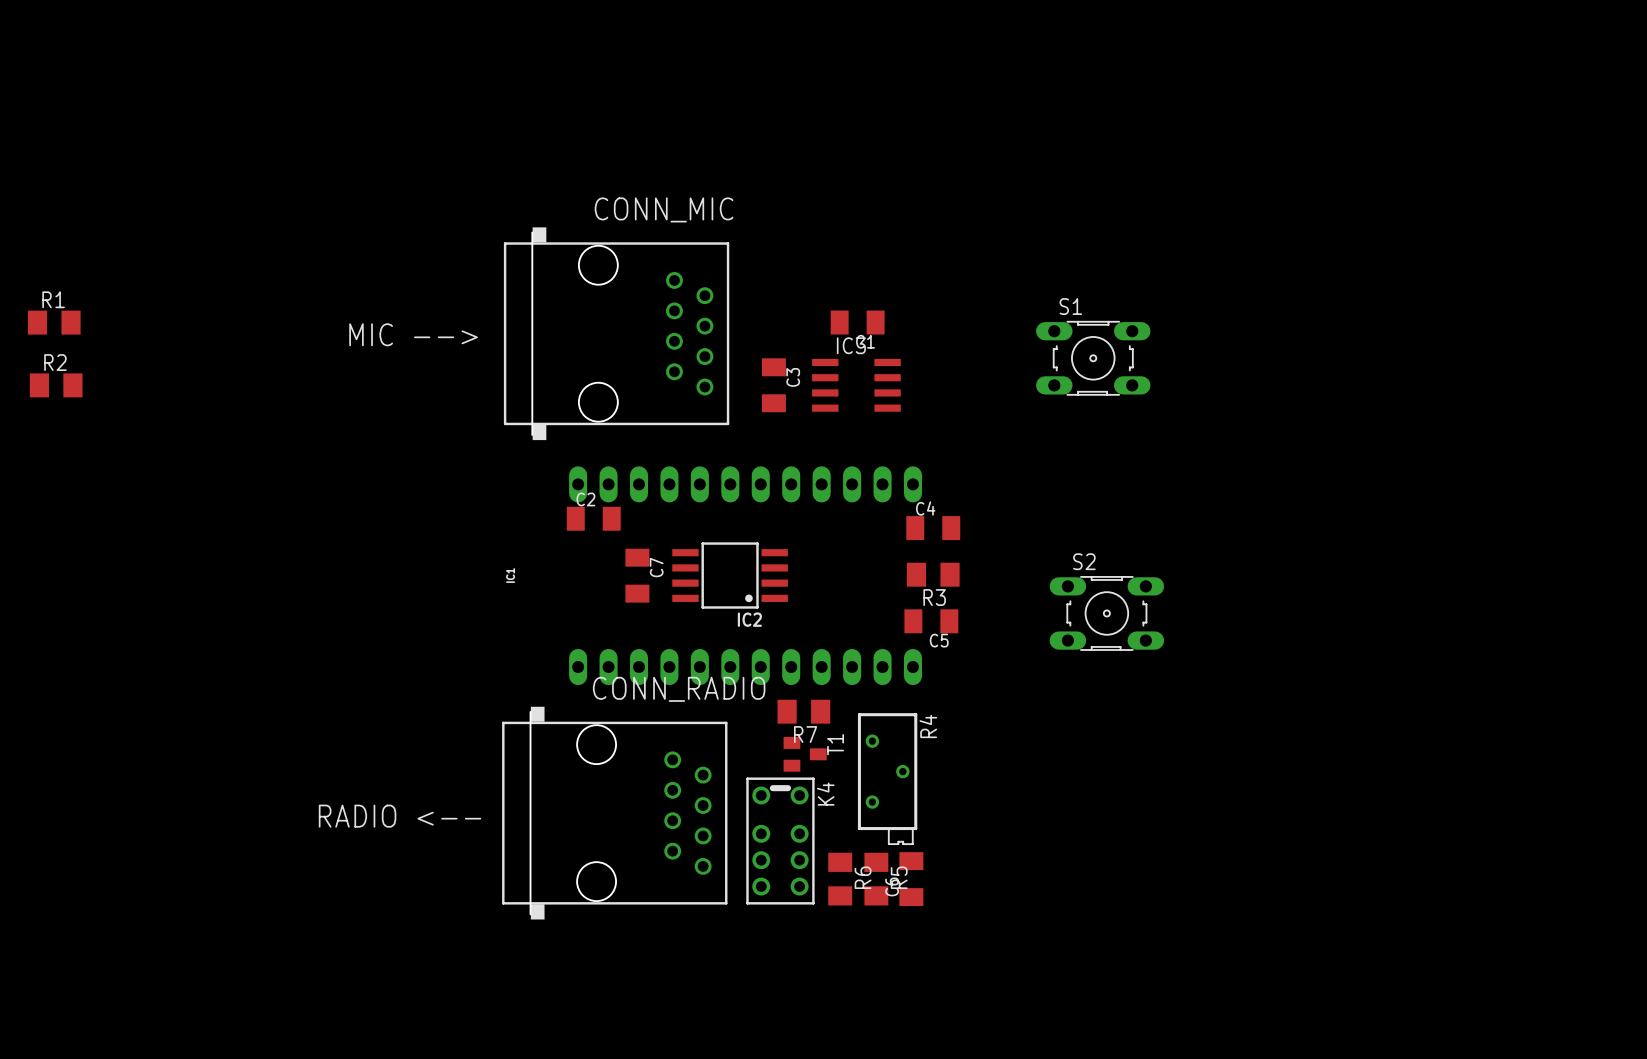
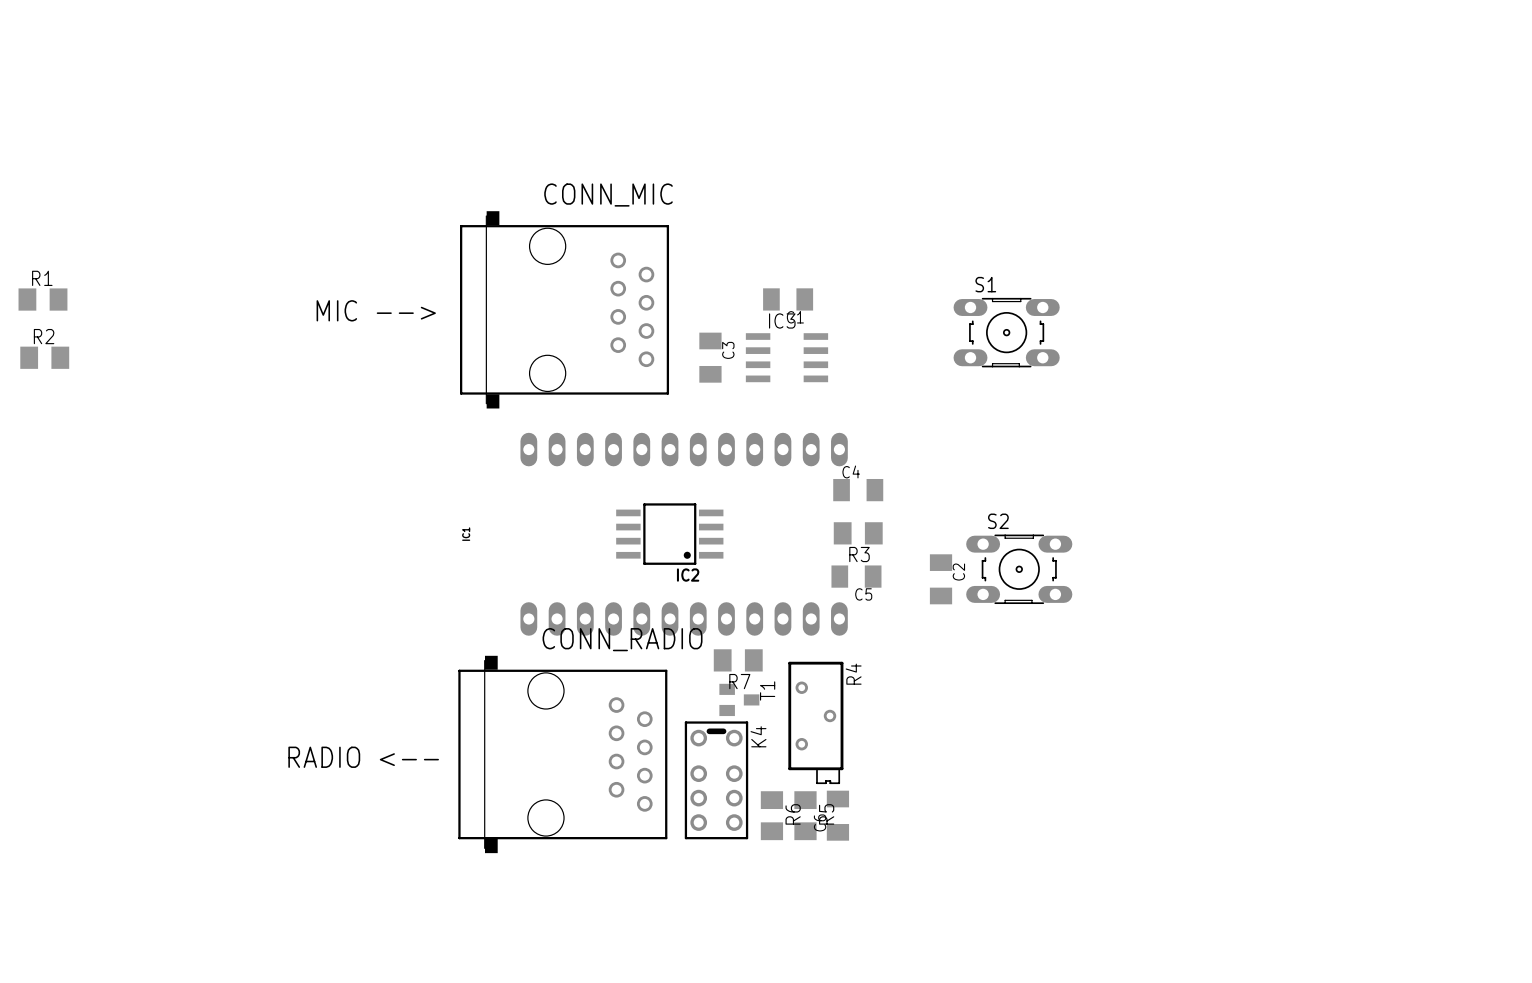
C2 rotation: 0° (593, 518) -> 90° clockwise (941, 579)
C2 position: (593, 518) -> (941, 579)
C7: (637, 575) -> none

